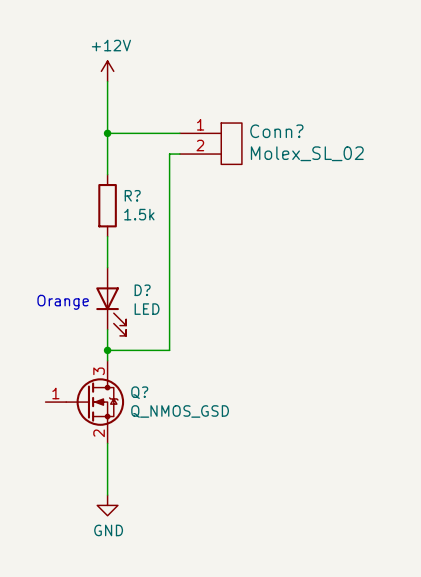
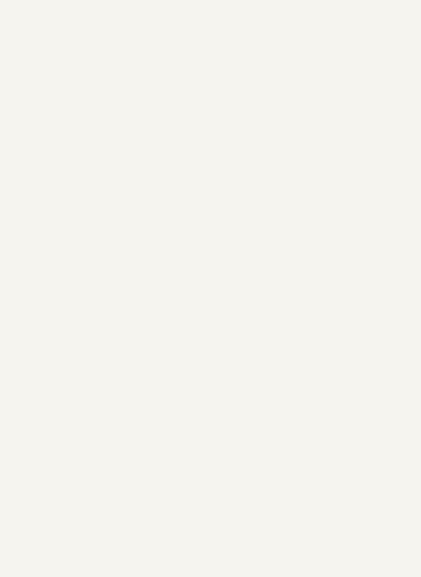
power symbol: +12V (107, 71) -> none
wire: (107, 81) (107, 174) -> none
wire: (107, 133) (179, 133) -> none
junction: (107, 133) -> none
Conn?: Molex_SL_02 (210, 143) -> none
wire: (179, 154) (169, 154) (169, 350) (107, 350) -> none
R?: 1.5k (107, 205) -> none
wire: (107, 236) (107, 267) -> none
D?: LED (111, 301) -> none
text: Orange (63, 302) -> none
wire: (107, 329) (107, 360) -> none
junction: (107, 350) -> none
Q?: Q_NMOS_GSD (84, 402) -> none
wire: (107, 443) (107, 495) -> none
power symbol: GND (107, 505) -> none

